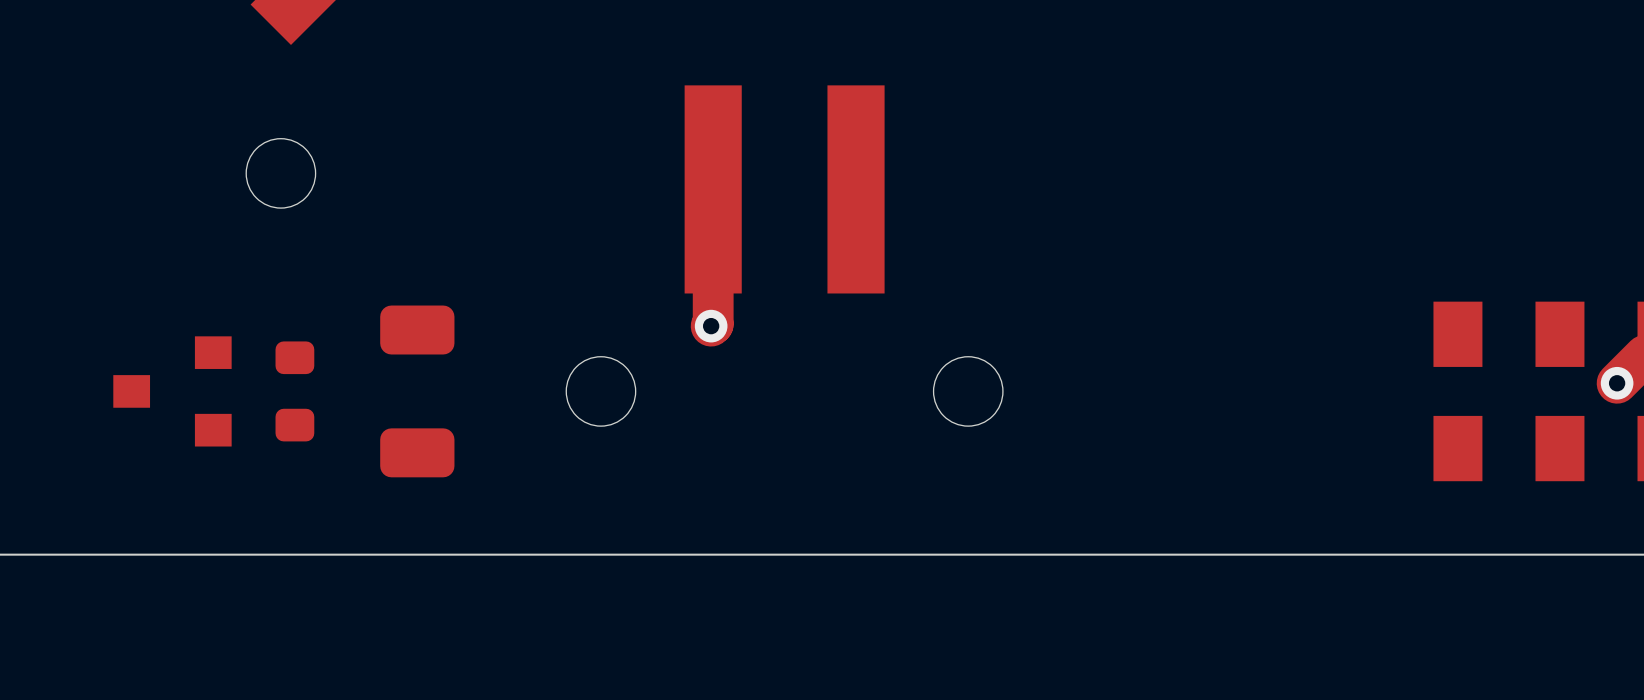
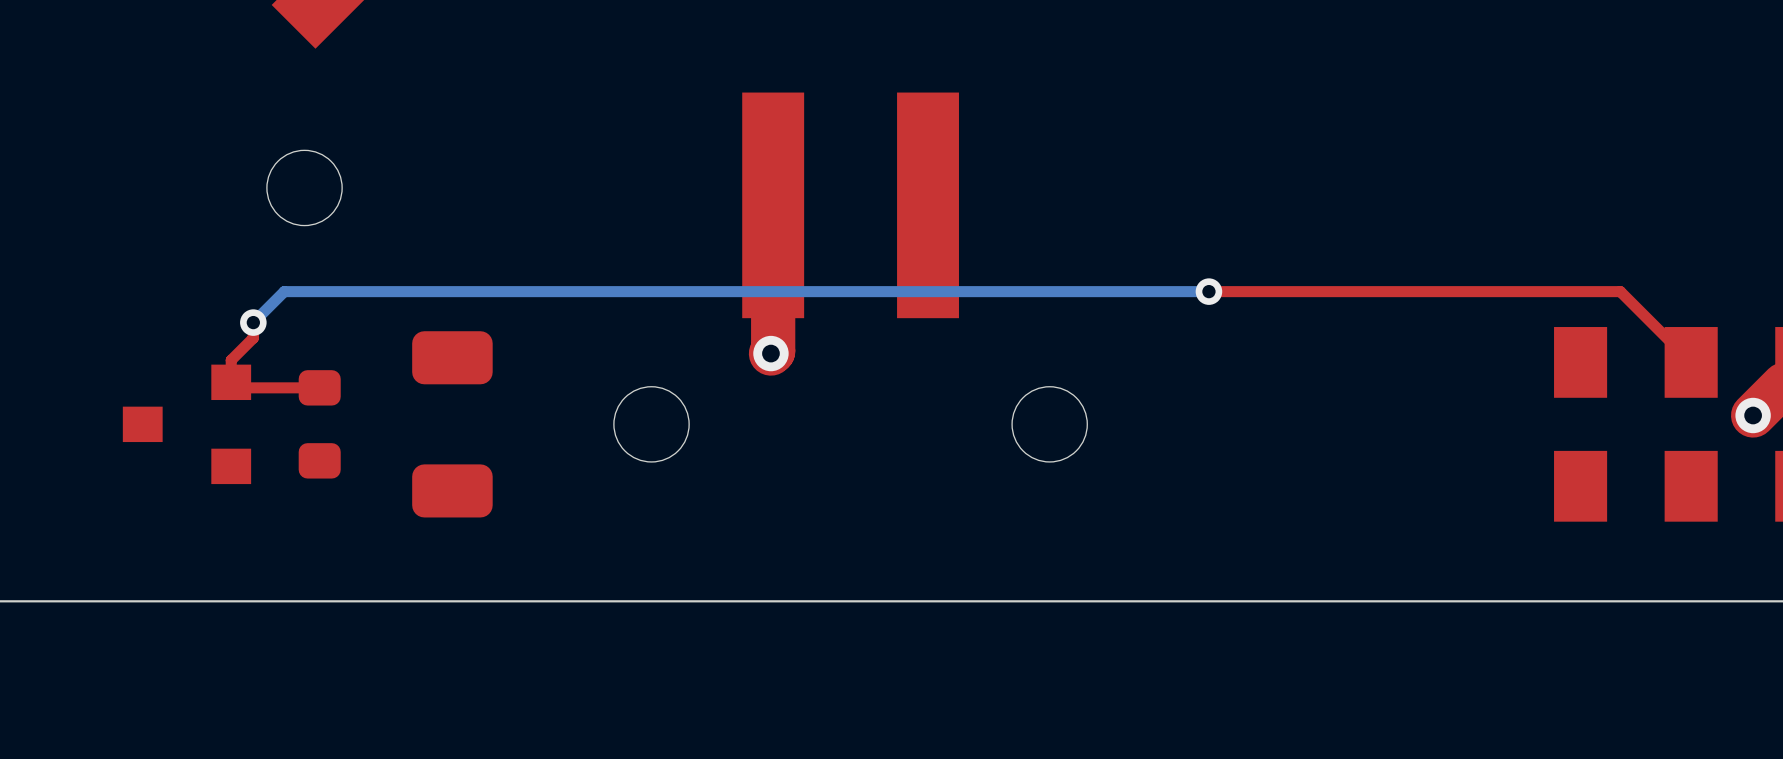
top track: none -> (1208, 291) (1620, 291) (1691, 362)
bottom track: none -> (1208, 291) (284, 291) (253, 322)
via: none -> (1208, 291)
top track: none -> (253, 322) (253, 338) (231, 360) (231, 382) (236, 387) (319, 387)
via: none -> (253, 322)

